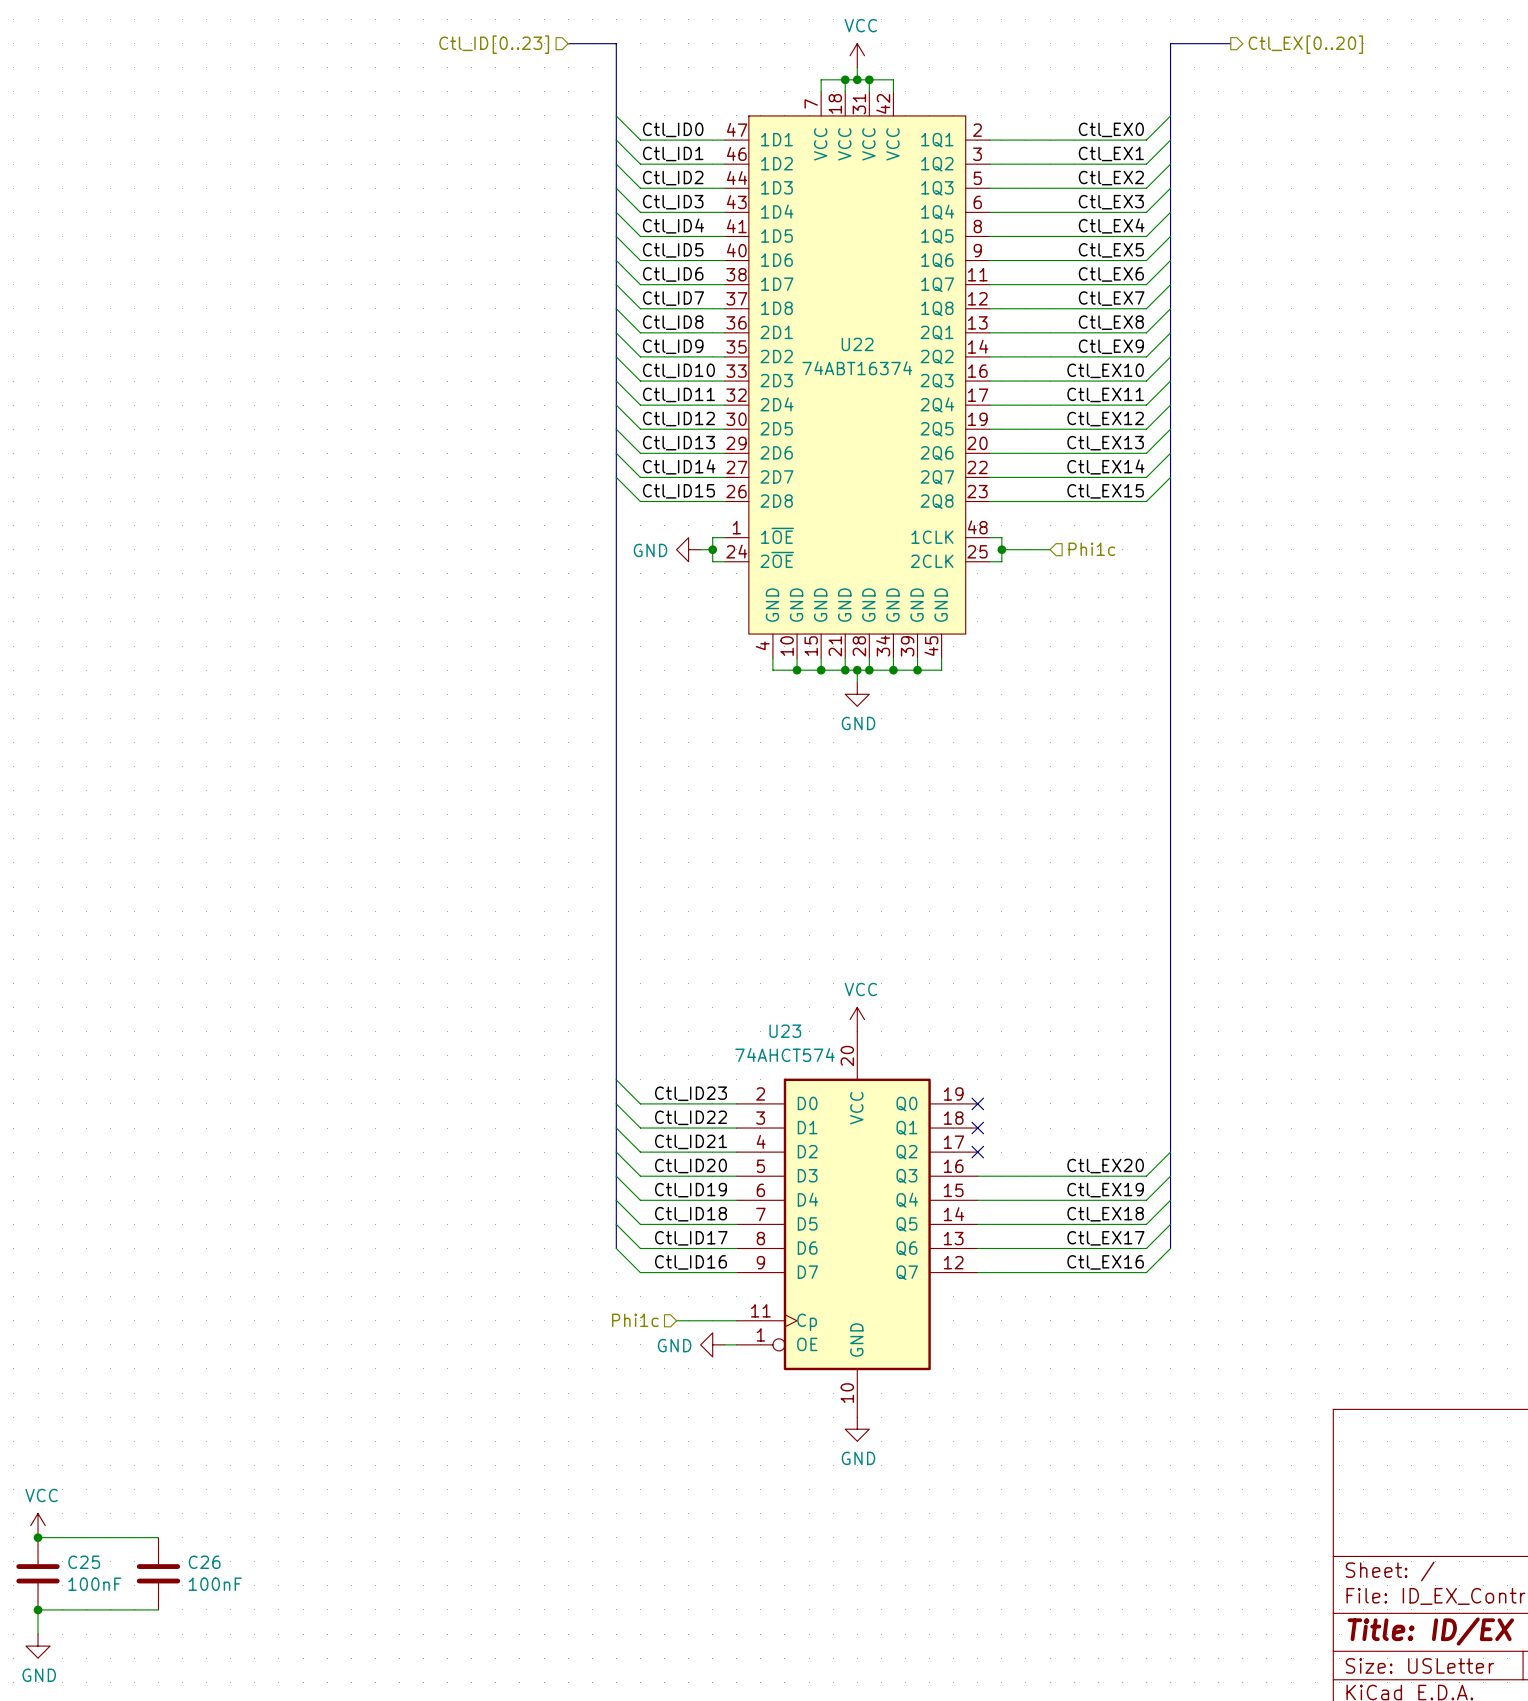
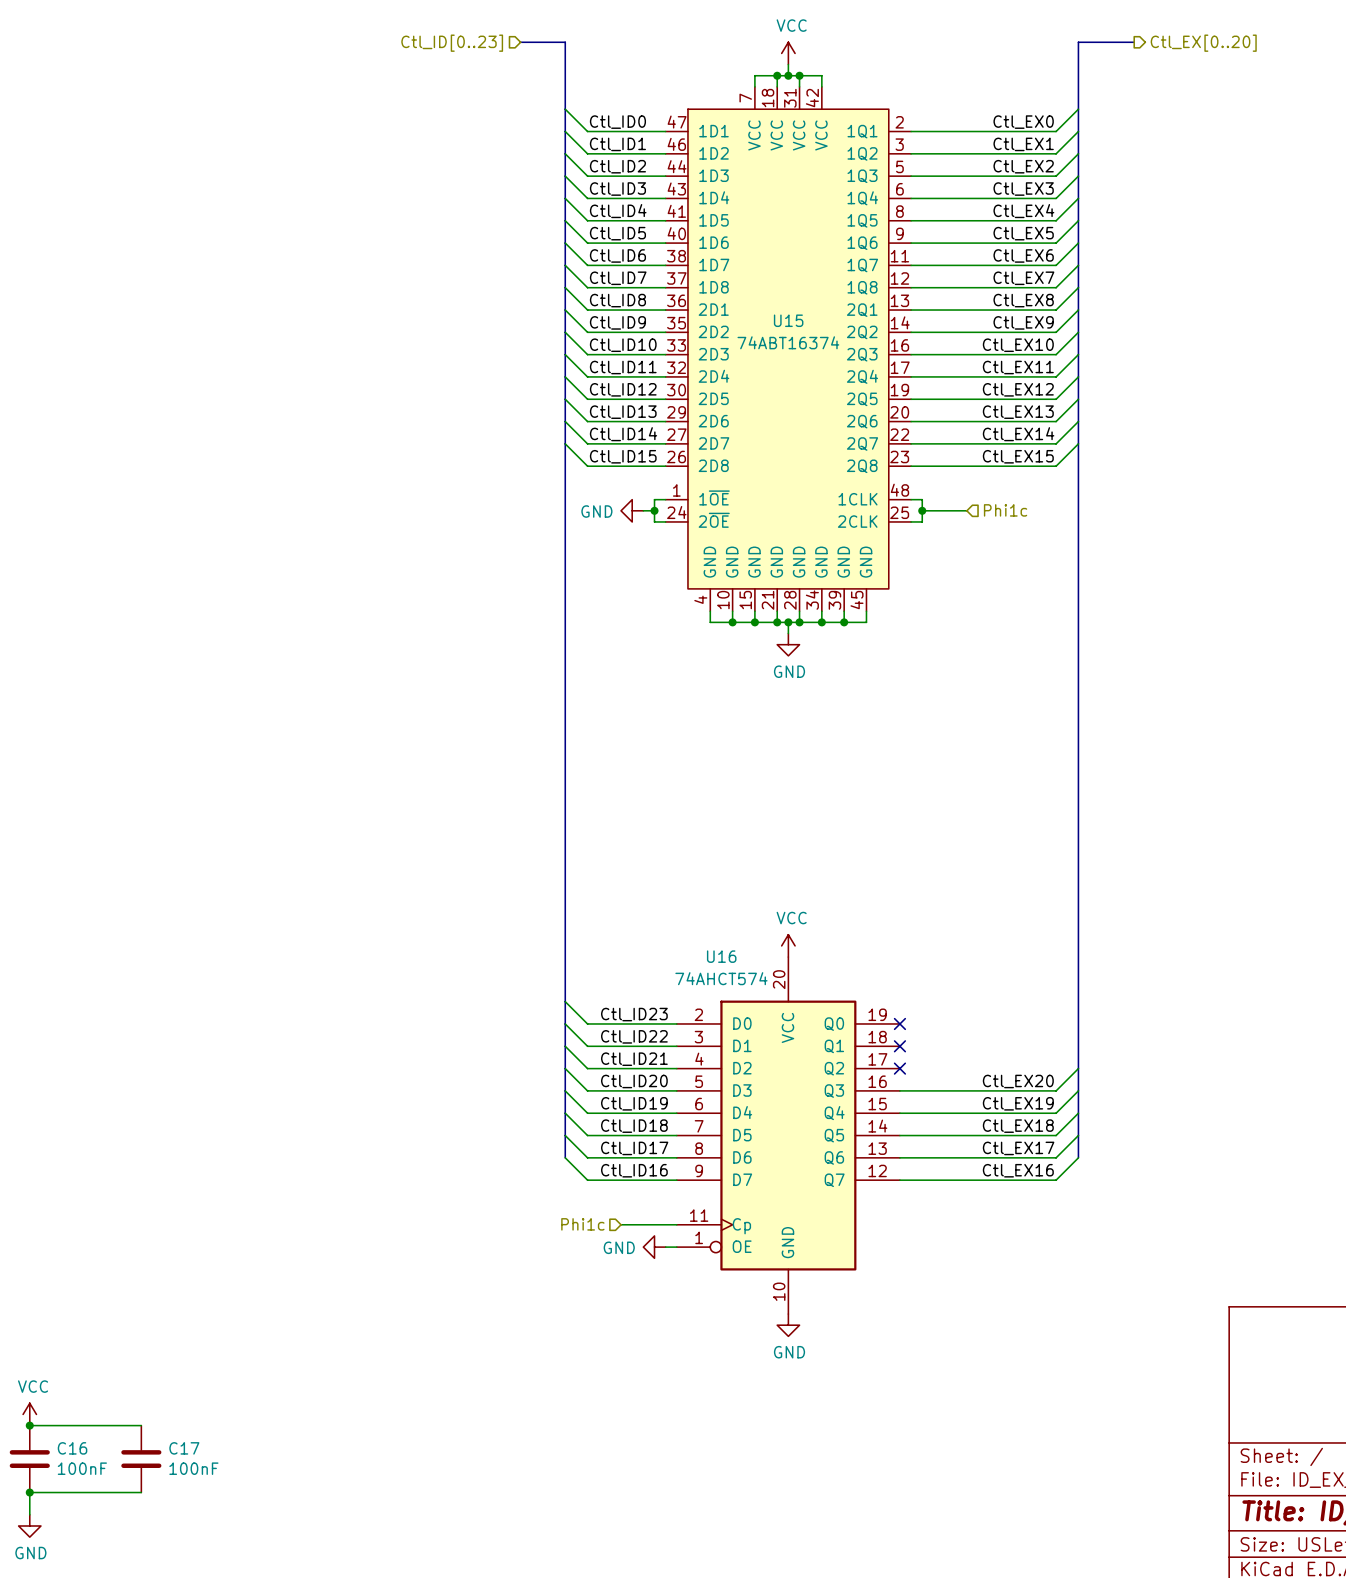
U22 name: U22 (857, 344) -> U15 (788, 320)
U23 name: U23 (785, 1031) -> U16 (721, 956)
C25 name: C25 (84, 1562) -> C16 (72, 1448)
C26 name: C26 (204, 1562) -> C17 (184, 1448)

